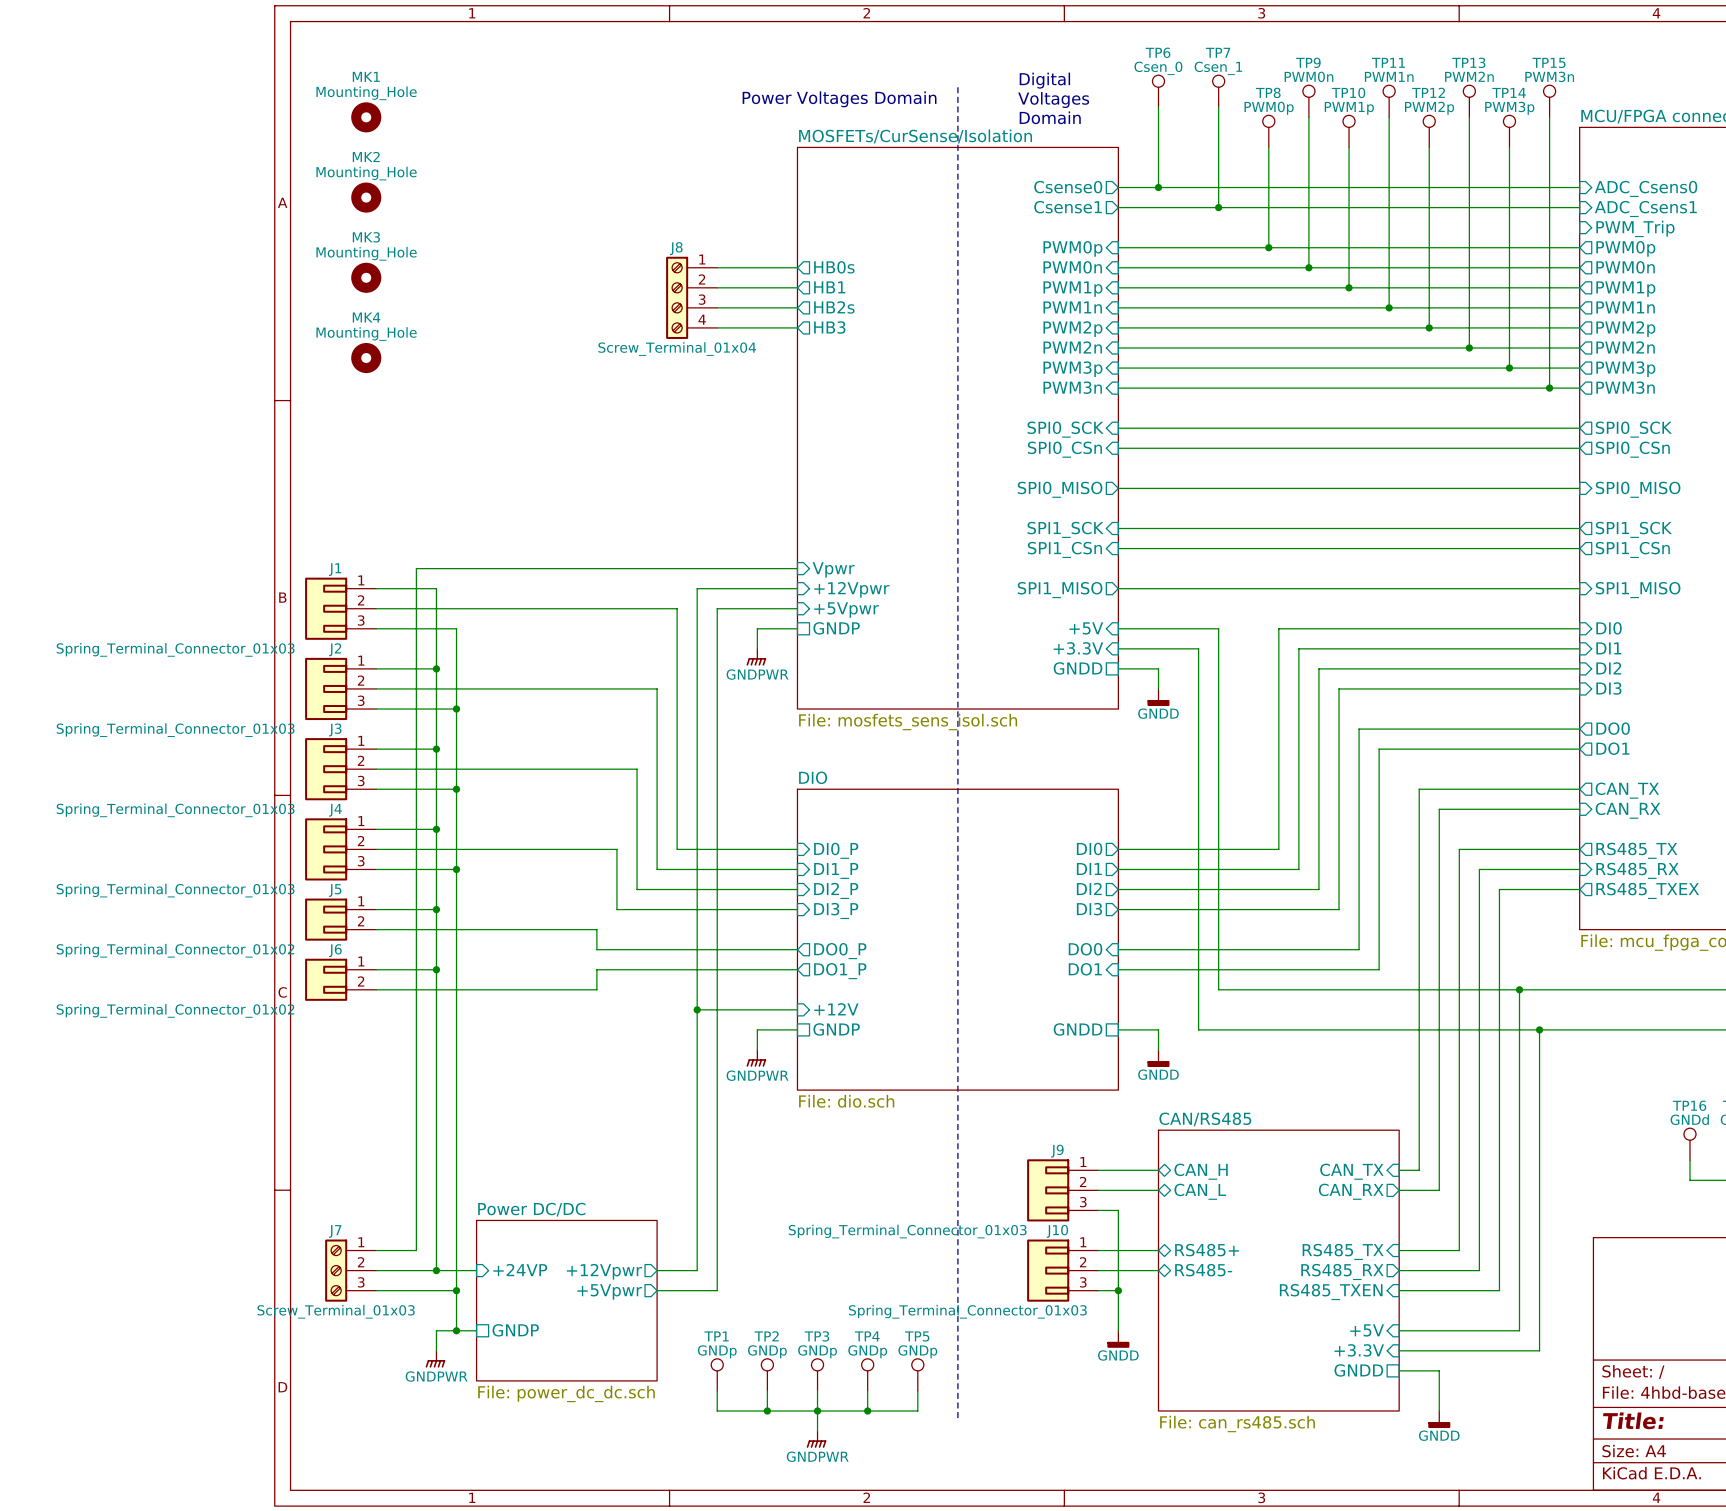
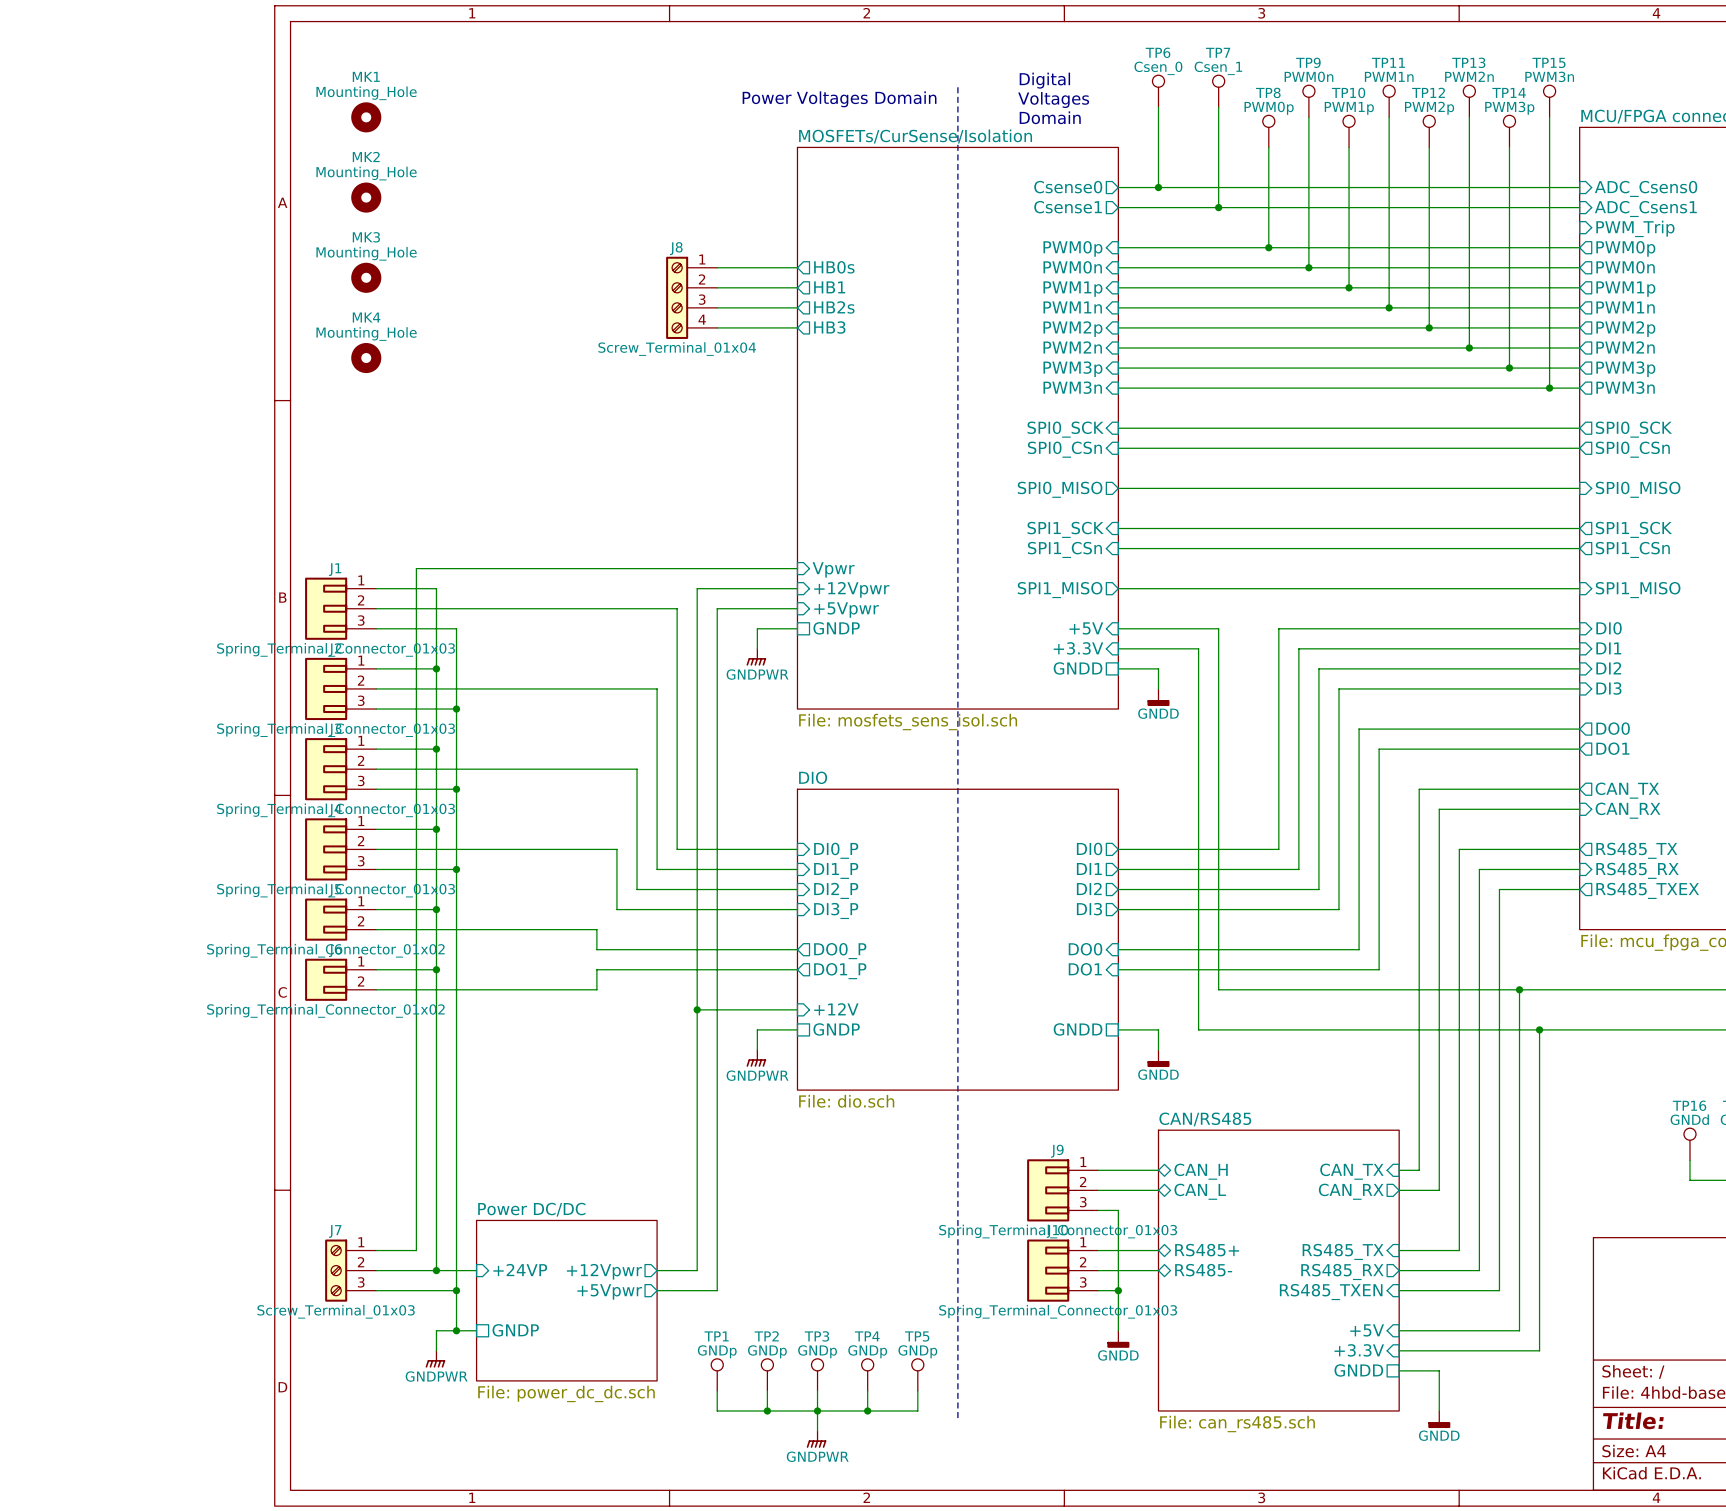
J1 value position: Spring_Terminal_Connector_01x03 (175, 649) -> Spring_Terminal_Connector_01x03 (336, 649)
J2 value position: Spring_Terminal_Connector_01x03 (175, 730) -> Spring_Terminal_Connector_01x03 (336, 730)
J3 value position: Spring_Terminal_Connector_01x03 (175, 810) -> Spring_Terminal_Connector_01x03 (336, 810)
J4 value position: Spring_Terminal_Connector_01x03 (175, 890) -> Spring_Terminal_Connector_01x03 (336, 890)
J5 value position: Spring_Terminal_Connector_01x02 (175, 950) -> Spring_Terminal_Connector_01x02 (325, 950)
J6 value position: Spring_Terminal_Connector_01x02 (175, 1010) -> Spring_Terminal_Connector_01x02 (325, 1010)
J9 value position: Spring_Terminal_Connector_01x03 (907, 1231) -> Spring_Terminal_Connector_01x03 (1058, 1231)
J10 value position: Spring_Terminal_Connector_01x03 (967, 1311) -> Spring_Terminal_Connector_01x03 (1058, 1311)

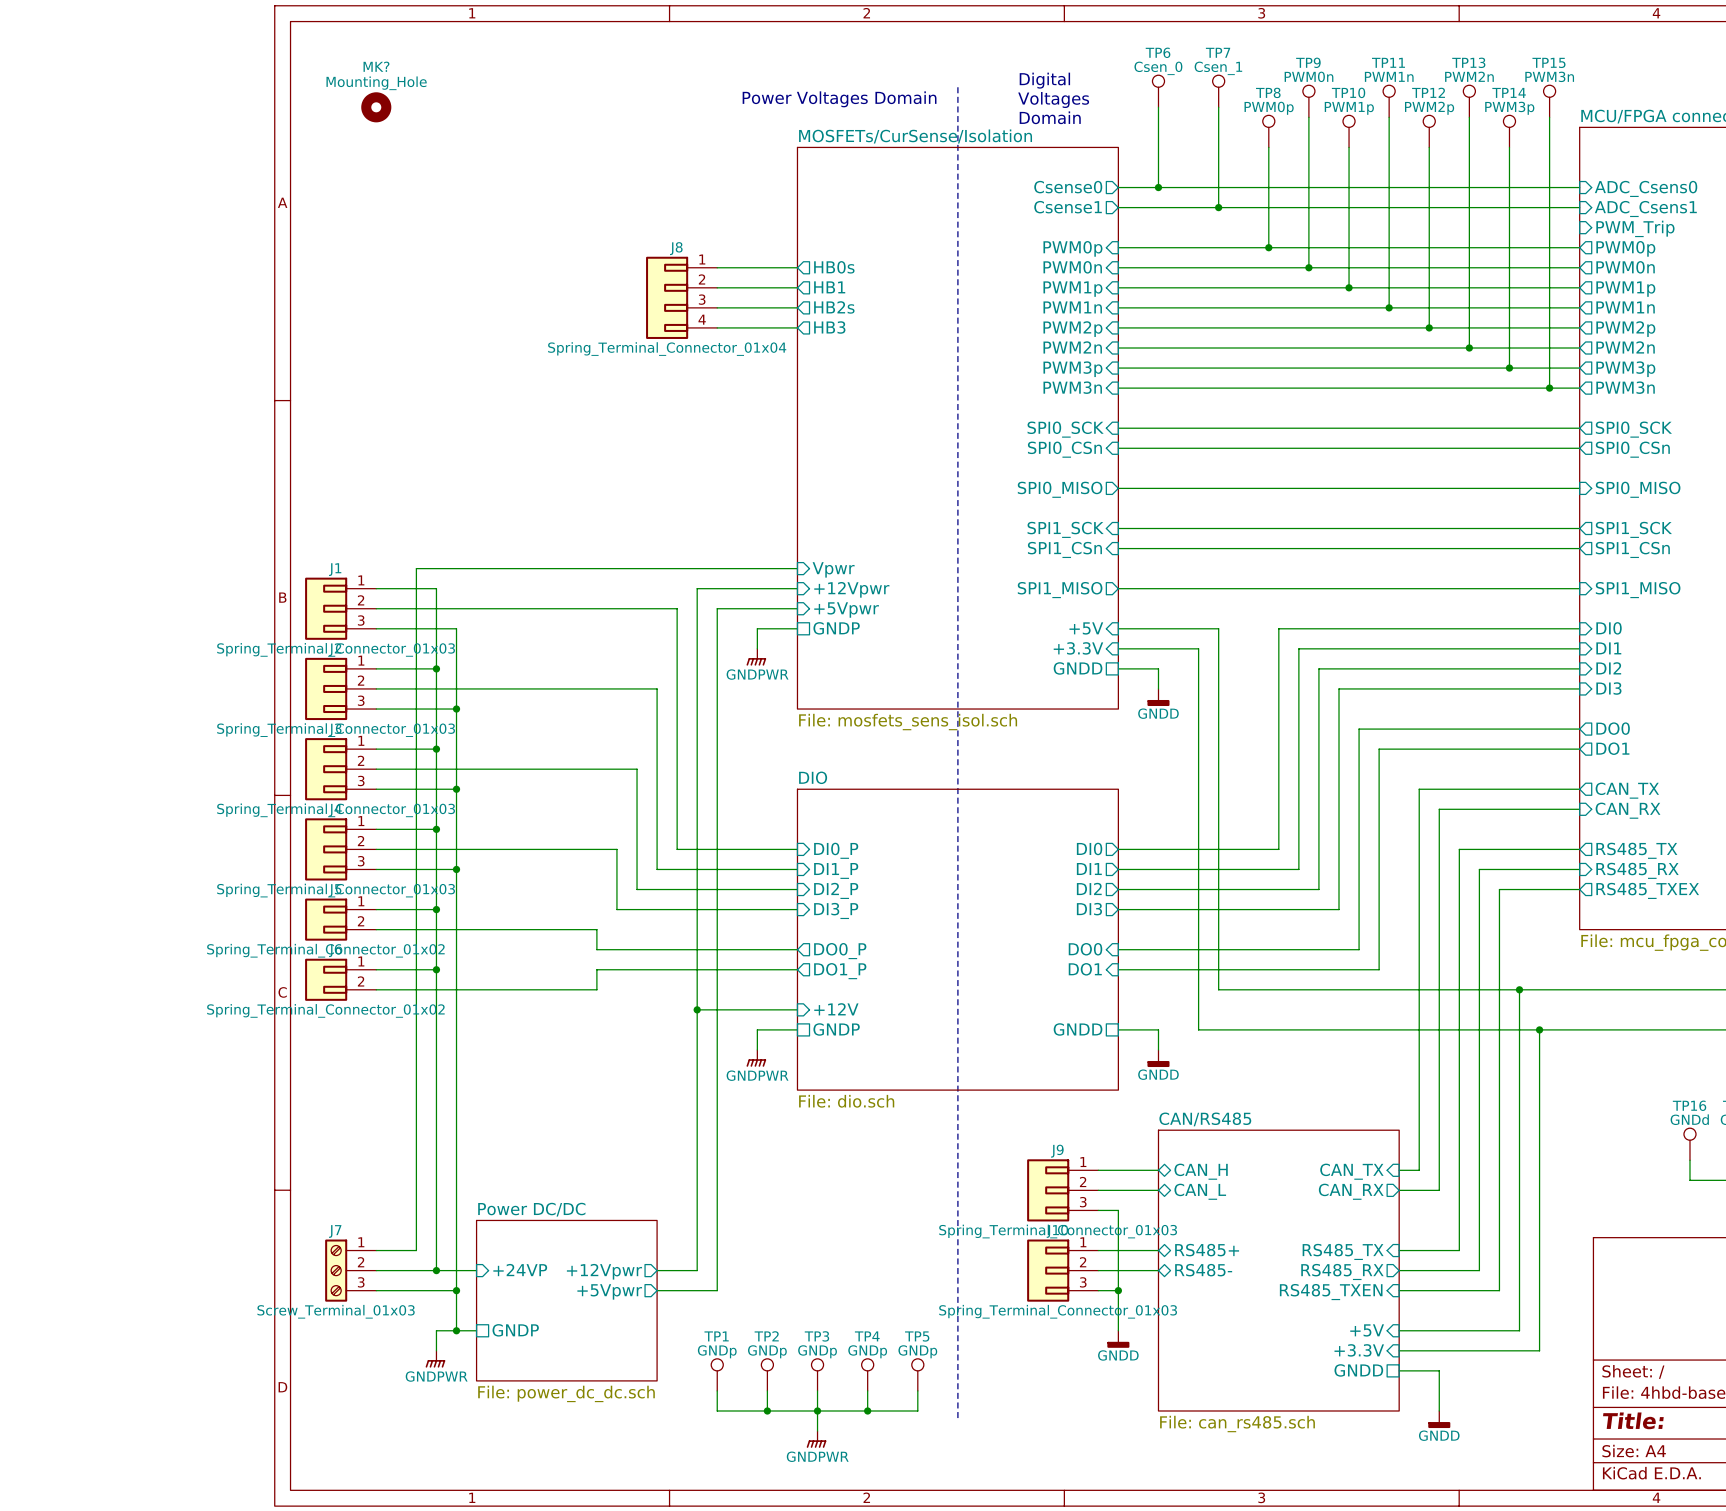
MK?: none -> Mounting_Hole (376, 107)
MK1: Mounting_Hole (366, 117) -> none
MK2: Mounting_Hole (366, 197) -> none
J8 symbol: [666, 256, 718, 339] -> [646, 256, 718, 339]
MK3: Mounting_Hole (366, 277) -> none
J8 value: Screw_Terminal_01x04 (677, 349) -> Spring_Terminal_Connector_01x04 (667, 349)
MK4: Mounting_Hole (366, 358) -> none

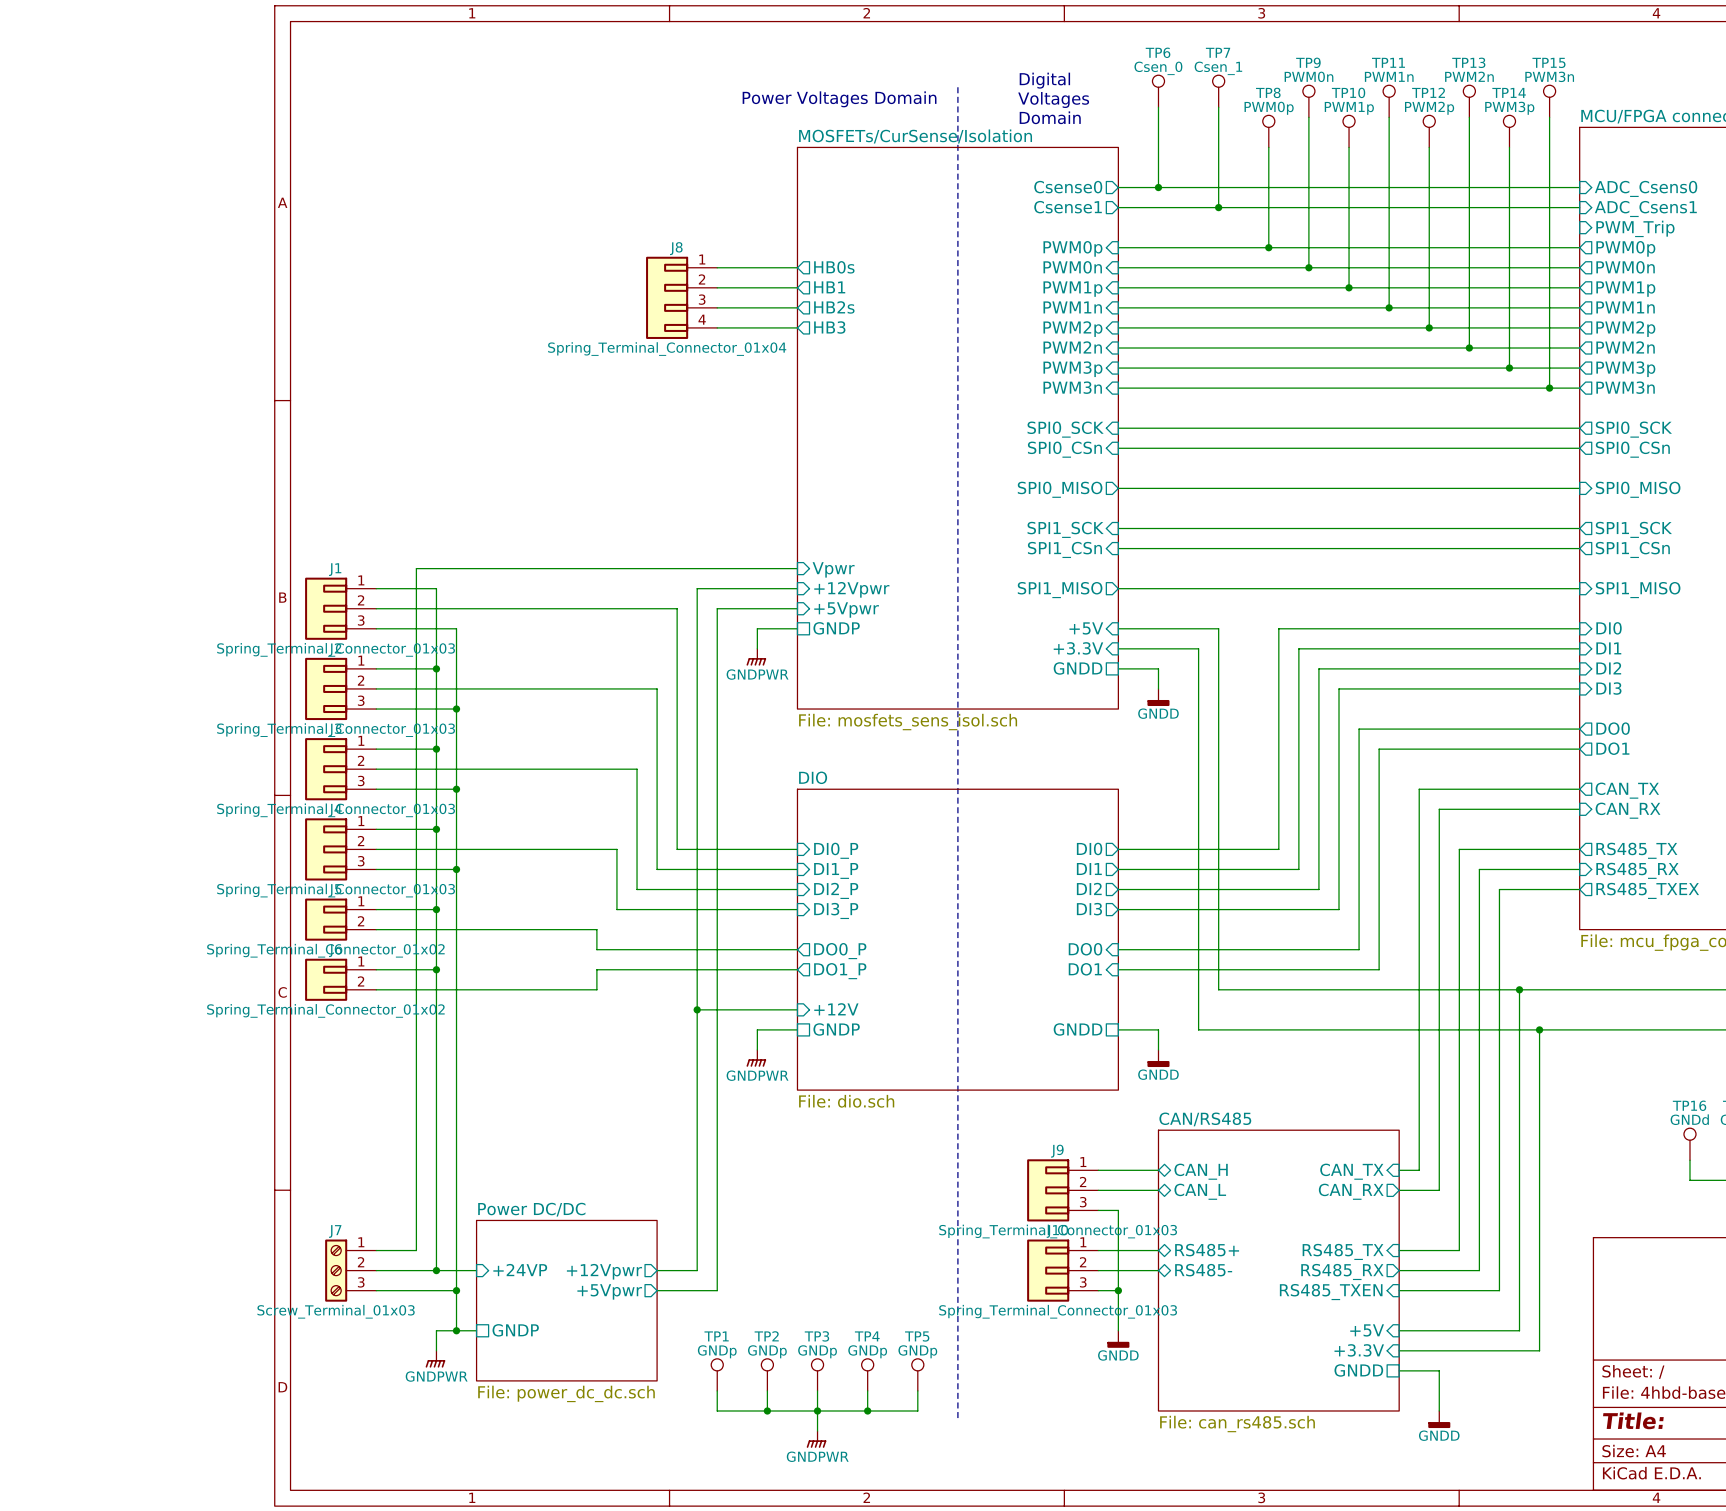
MK?: Mounting_Hole (376, 107) -> none

